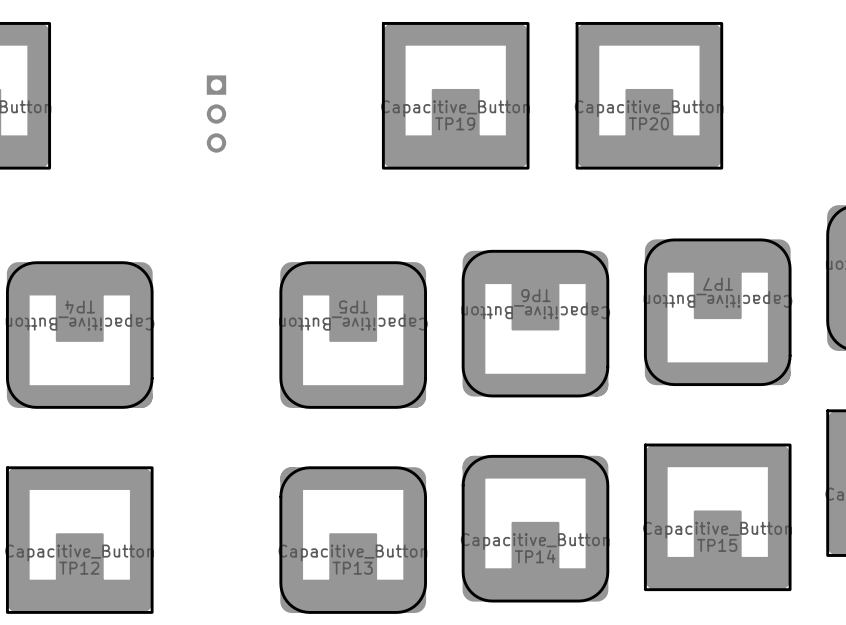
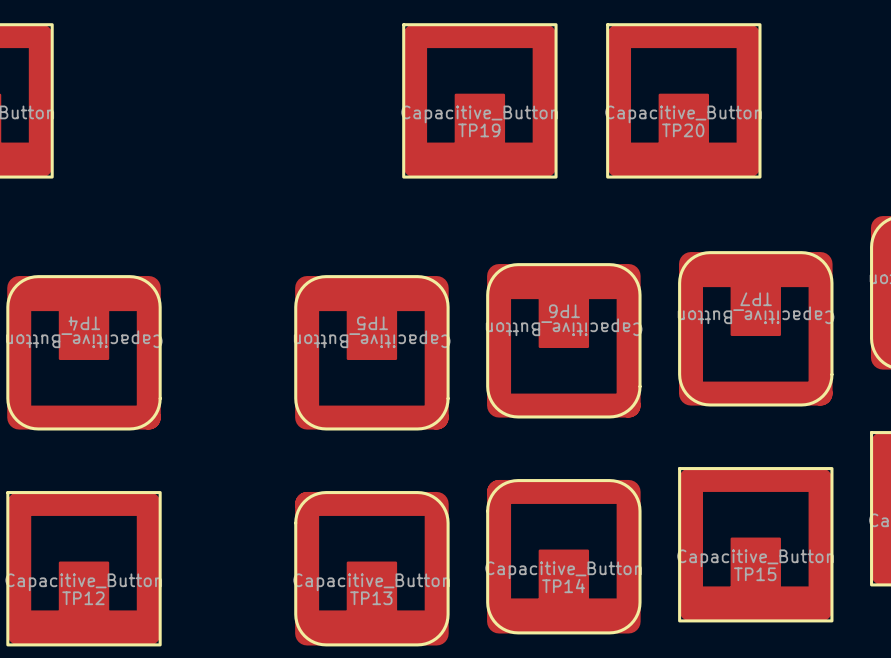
part: (216, 114) -> none

